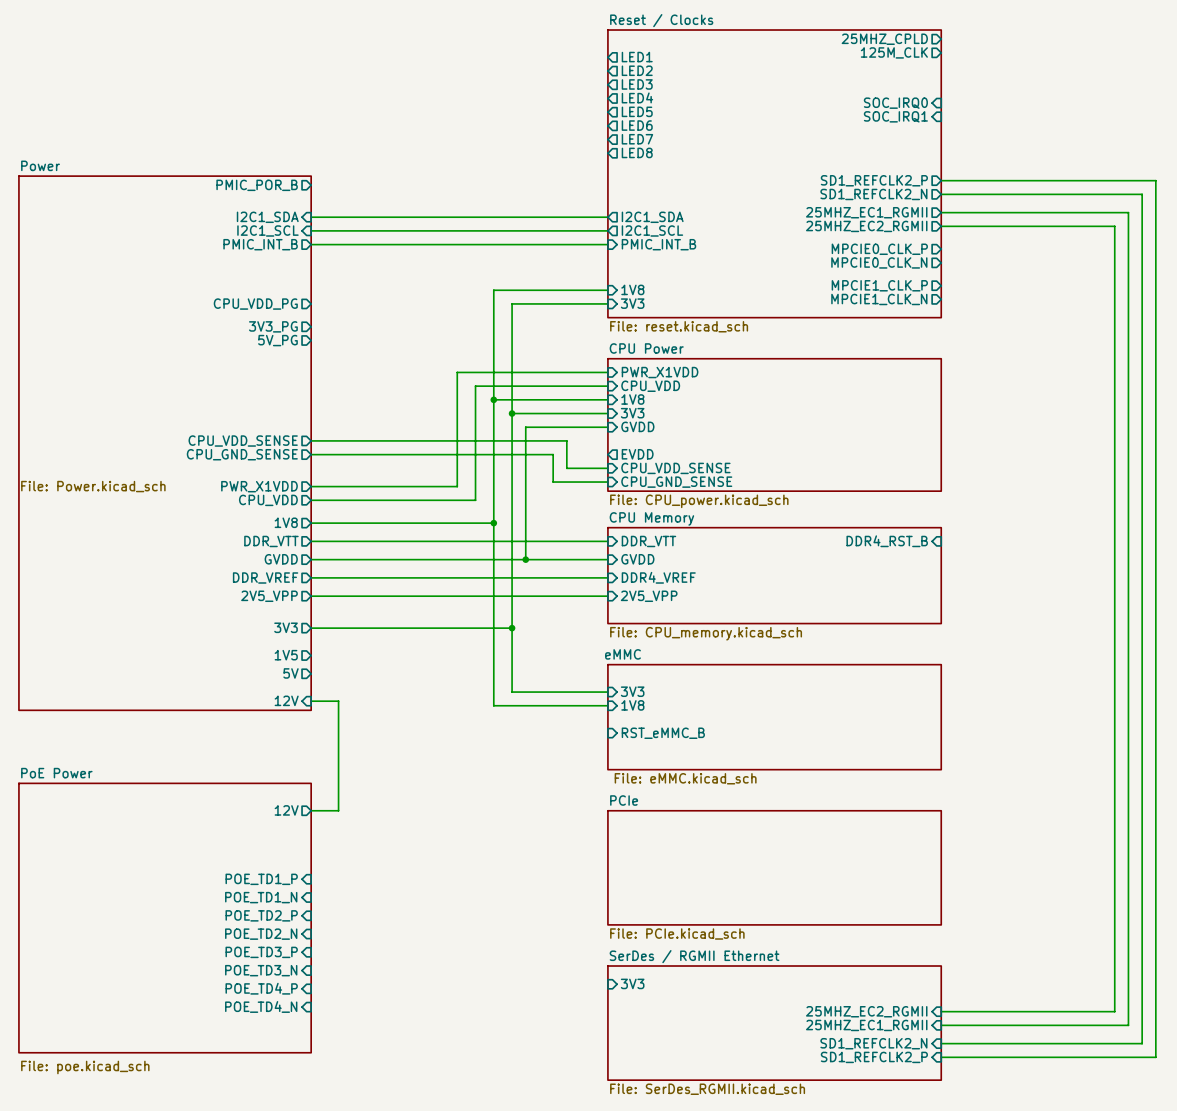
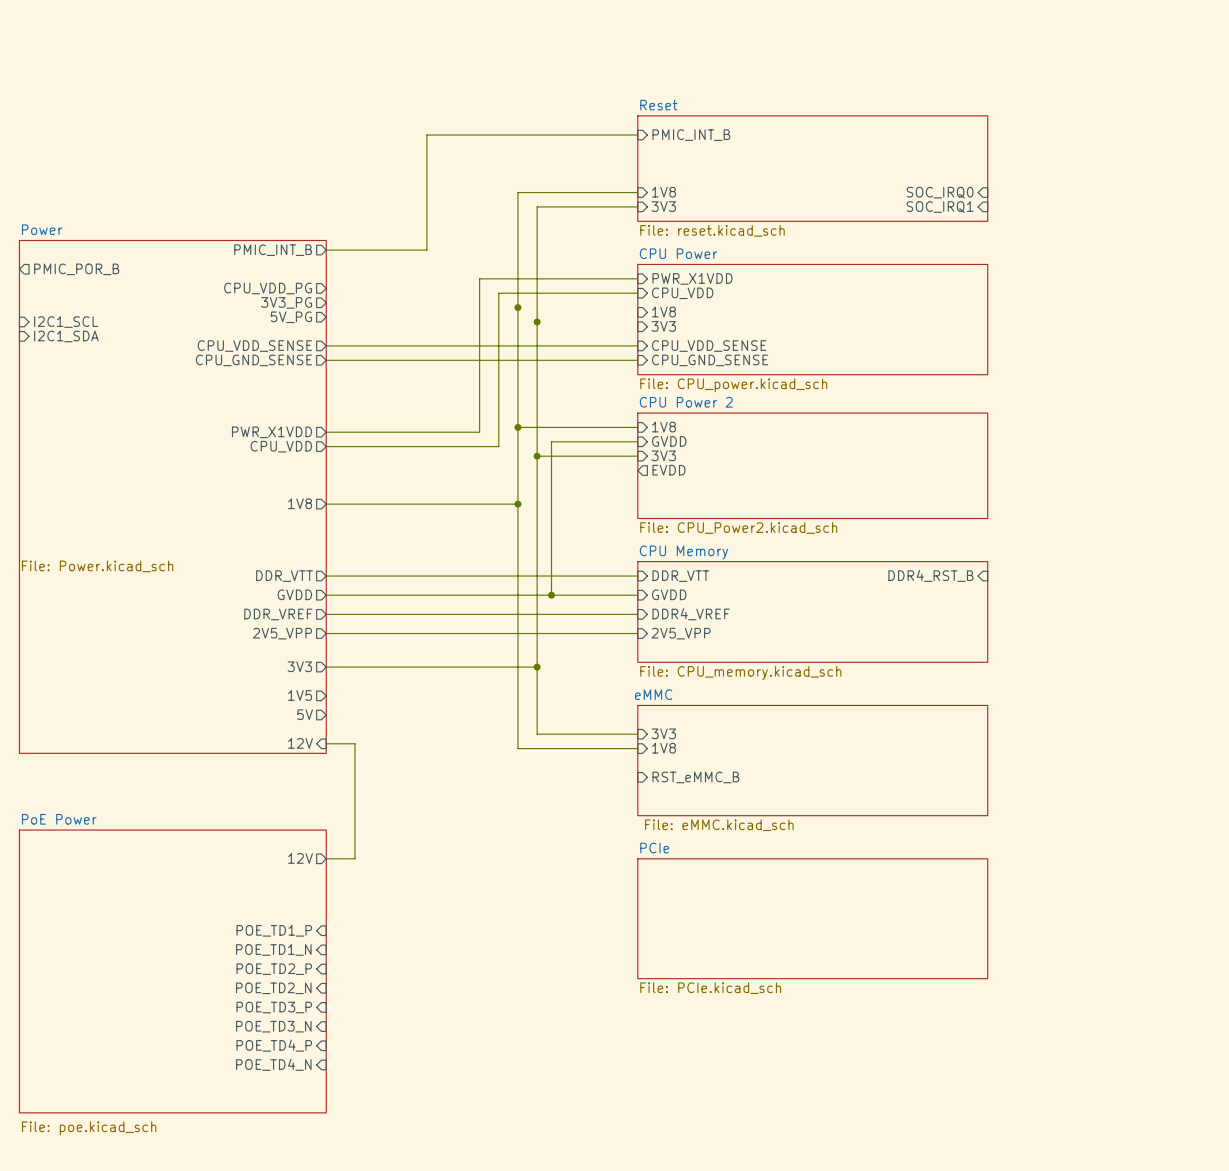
sheet pin: 25MHZ_CPLD (884, 39) -> none
sheet pin: 125M_CLK (894, 52) -> none
sheet pin: LED1 (637, 57) -> none
sheet pin: LED2 (637, 70) -> none
sheet pin: LED3 (637, 84) -> none
sheet pin: LED4 (637, 97) -> none
sheet pin position: SOC_IRQ0 (895, 103) -> SOC_IRQ0 (940, 192)
sheet pin: LED5 (637, 111) -> none
sheet pin position: SOC_IRQ1 (895, 116) -> SOC_IRQ1 (940, 207)
sheet pin: LED6 (637, 125) -> none
sheet pin: LED7 (637, 139) -> none
sheet pin: LED8 (637, 152) -> none
sheet Reset: none -> File: reset.kicad_sch (812, 168)
sheet Reset / Clocks: File: reset.kicad_sch (774, 173) -> none
sheet pin: none -> 1V8 (663, 192)
sheet pin: SD1_REFCLK2_P (874, 180) -> none
wire: (941, 180) (1155, 180) (1155, 1057) (941, 1057) -> none
sheet pin: PMIC_POR_B (257, 185) -> none
sheet pin: none -> 3V3 (663, 206)
sheet pin: SD1_REFCLK2_N (873, 194) -> none
wire: (941, 194) (1142, 194) (1142, 1043) (941, 1043) -> none
sheet pin: 25MHZ_EC1_RGMII (866, 212) -> none
wire: (941, 212) (1128, 212) (1128, 1025) (941, 1025) -> none
sheet pin: I2C1_SDA (267, 217) -> none
wire: (311, 217) (607, 217) -> (326, 360) (637, 360)
sheet pin: I2C1_SDA (652, 217) -> none
sheet pin: 25MHZ_EC2_RGMII (866, 226) -> none
wire: (941, 226) (1114, 226) (1114, 1011) (941, 1011) -> none
sheet pin shape: input (267, 230) -> output (273, 250)
sheet pin: I2C1_SCL (267, 230) -> PMIC_INT_B (273, 250)
wire: (407, 230) (607, 230) -> (426, 250) (426, 135) (637, 135)
sheet pin: I2C1_SCL (652, 230) -> none
sheet pin: PMIC_INT_B (260, 244) -> none
wire: (311, 244) (607, 244) -> (326, 345) (637, 345)
sheet pin position: PMIC_INT_B (658, 244) -> PMIC_INT_B (691, 135)
sheet pin: none -> PMIC_POR_B (76, 269)
sheet pin: MPCIE0_CLK_P (879, 249) -> none
sheet pin: MPCIE0_CLK_N (879, 262) -> none
junction: none -> (517, 307)
sheet pin: MPCIE1_CLK_P (879, 285) -> none
wire: (493, 290) (607, 290) -> (517, 312) (517, 192) (637, 192)
sheet CPU Power: none -> File: CPU_power.kicad_sch (812, 319)
sheet pin: none -> I2C1_SCL (66, 322)
junction: none -> (537, 321)
sheet pin: MPCIE1_CLK_N (879, 299) -> none
wire: (512, 303) (607, 303) -> (537, 326) (537, 206) (637, 206)
sheet pin position: CPU_VDD_PG (255, 304) -> CPU_VDD_PG (268, 288)
sheet pin: none -> I2C1_SDA (66, 336)
sheet pin position: 3V3_PG (273, 326) -> 3V3_PG (286, 302)
sheet pin position: 5V_PG (277, 340) -> 5V_PG (291, 317)
wire: (457, 372) (607, 372) -> (479, 398) (479, 278) (637, 278)
sheet pin position: PWR_X1VDD (660, 372) -> PWR_X1VDD (692, 278)
wire: (475, 386) (607, 386) -> (498, 413) (498, 293) (637, 293)
sheet pin position: CPU_VDD (650, 386) -> CPU_VDD (682, 293)
wire: (457, 404) (457, 486) (311, 486) -> (479, 432) (326, 432)
wire: (512, 413) (525, 413) -> (537, 456) (551, 456) (551, 441)
junction position: (512, 413) -> (537, 456)
sheet pin: 3V3 (632, 413) -> GVDD (669, 441)
wire: (475, 418) (475, 500) (311, 500) -> (498, 446) (326, 446)
sheet CPU Power: File: CPU_power.kicad_sch (774, 424) -> none
sheet pin: GVDD (637, 426) -> 3V3 (663, 455)
sheet CPU Power 2: none -> File: CPU_Power2.kicad_sch (812, 465)
wire: (311, 440) (566, 440) (566, 468) (607, 468) -> none
sheet pin position: CPU_VDD_SENSE (243, 441) -> CPU_VDD_SENSE (254, 346)
sheet Power: File: Power.kicad_sch (165, 443) -> none
sheet pin position: CPU_GND_SENSE (242, 454) -> CPU_GND_SENSE (253, 360)
wire: (311, 454) (553, 454) (553, 482) (607, 482) -> none
sheet pin position: EVDD (637, 454) -> EVDD (668, 470)
sheet Power: none -> File: Power.kicad_sch (172, 496)
sheet pin position: CPU_VDD_SENSE (675, 468) -> CPU_VDD_SENSE (709, 346)
junction: none -> (517, 504)
sheet pin position: CPU_GND_SENSE (676, 482) -> CPU_GND_SENSE (710, 360)
sheet pin position: PWR_X1VDD (259, 486) -> PWR_X1VDD (271, 432)
sheet pin position: CPU_VDD (268, 500) -> CPU_VDD (281, 446)
sheet pin position: 1V8 (286, 522) -> 1V8 (300, 503)
wire: (311, 523) (493, 523) -> (326, 504) (517, 504)
junction: (493, 523) -> none
sheet pin: 3V3 (632, 983) -> none
sheet pin: 25MHZ_EC2_RGMII (866, 1011) -> none
sheet SerDes / RGMII Ethernet: File: SerDes_RGMII.kicad_sch (774, 1023) -> none
sheet pin: 25MHZ_EC1_RGMII (866, 1025) -> none
sheet pin: SD1_REFCLK2_N (873, 1043) -> none
sheet pin: SD1_REFCLK2_P (874, 1057) -> none

